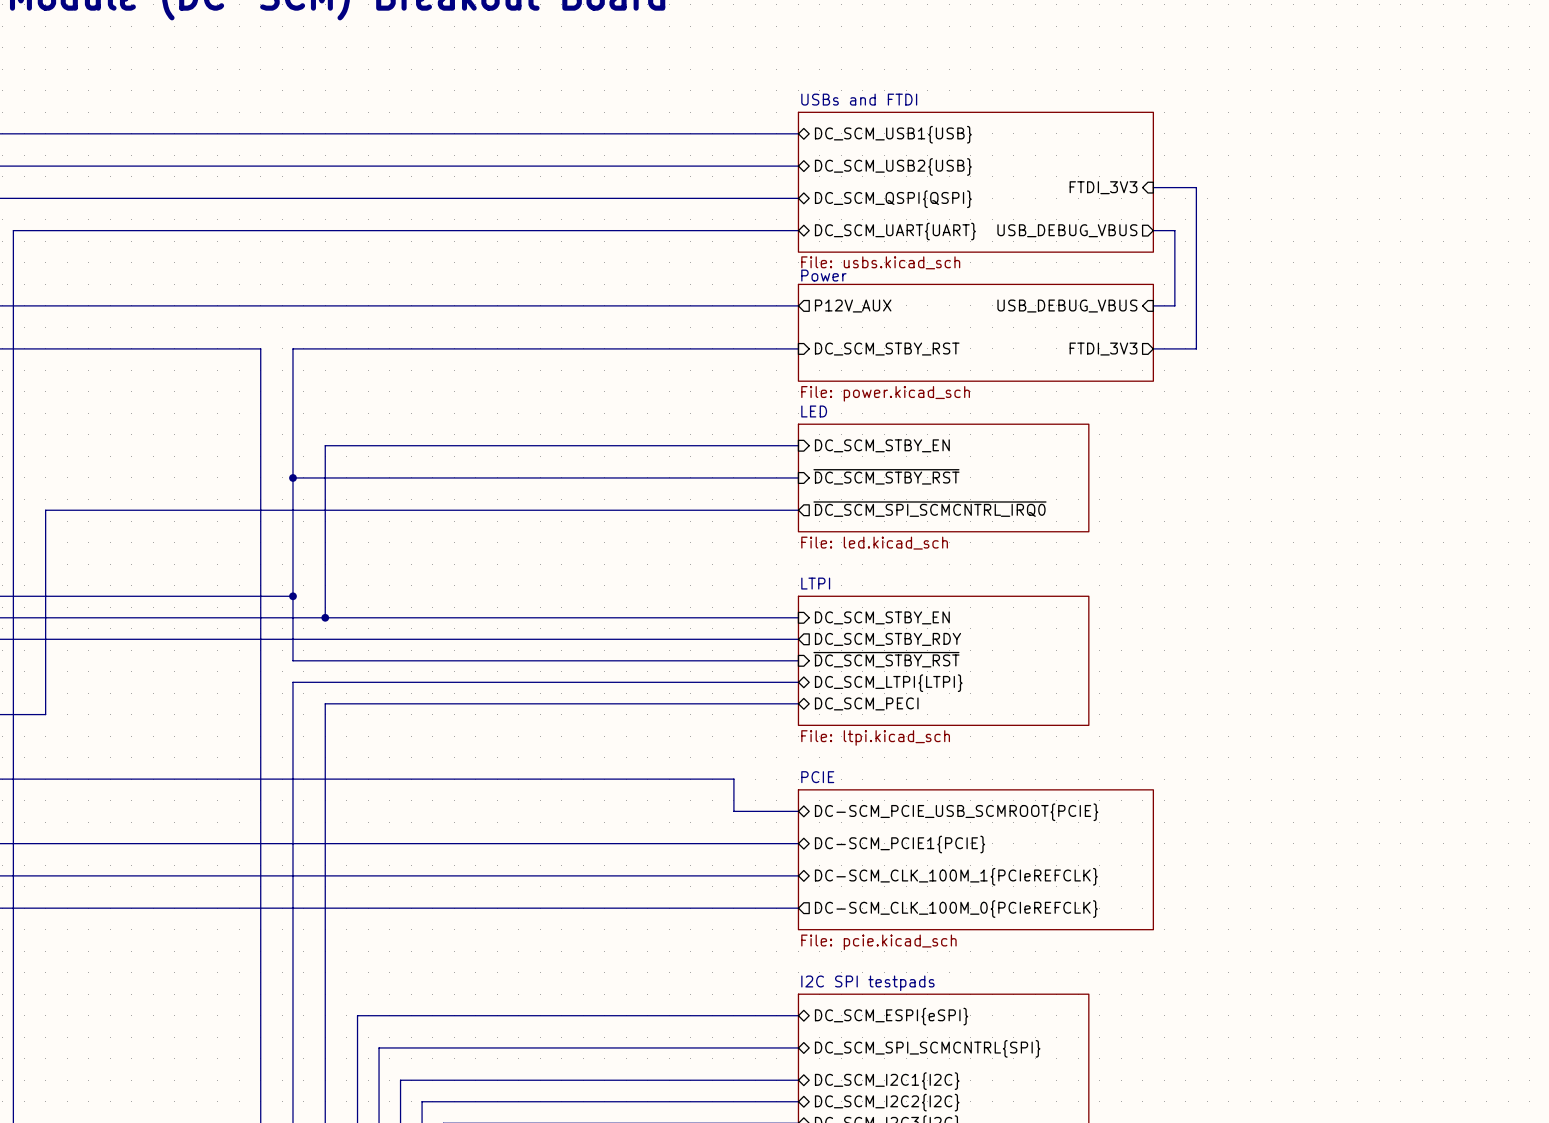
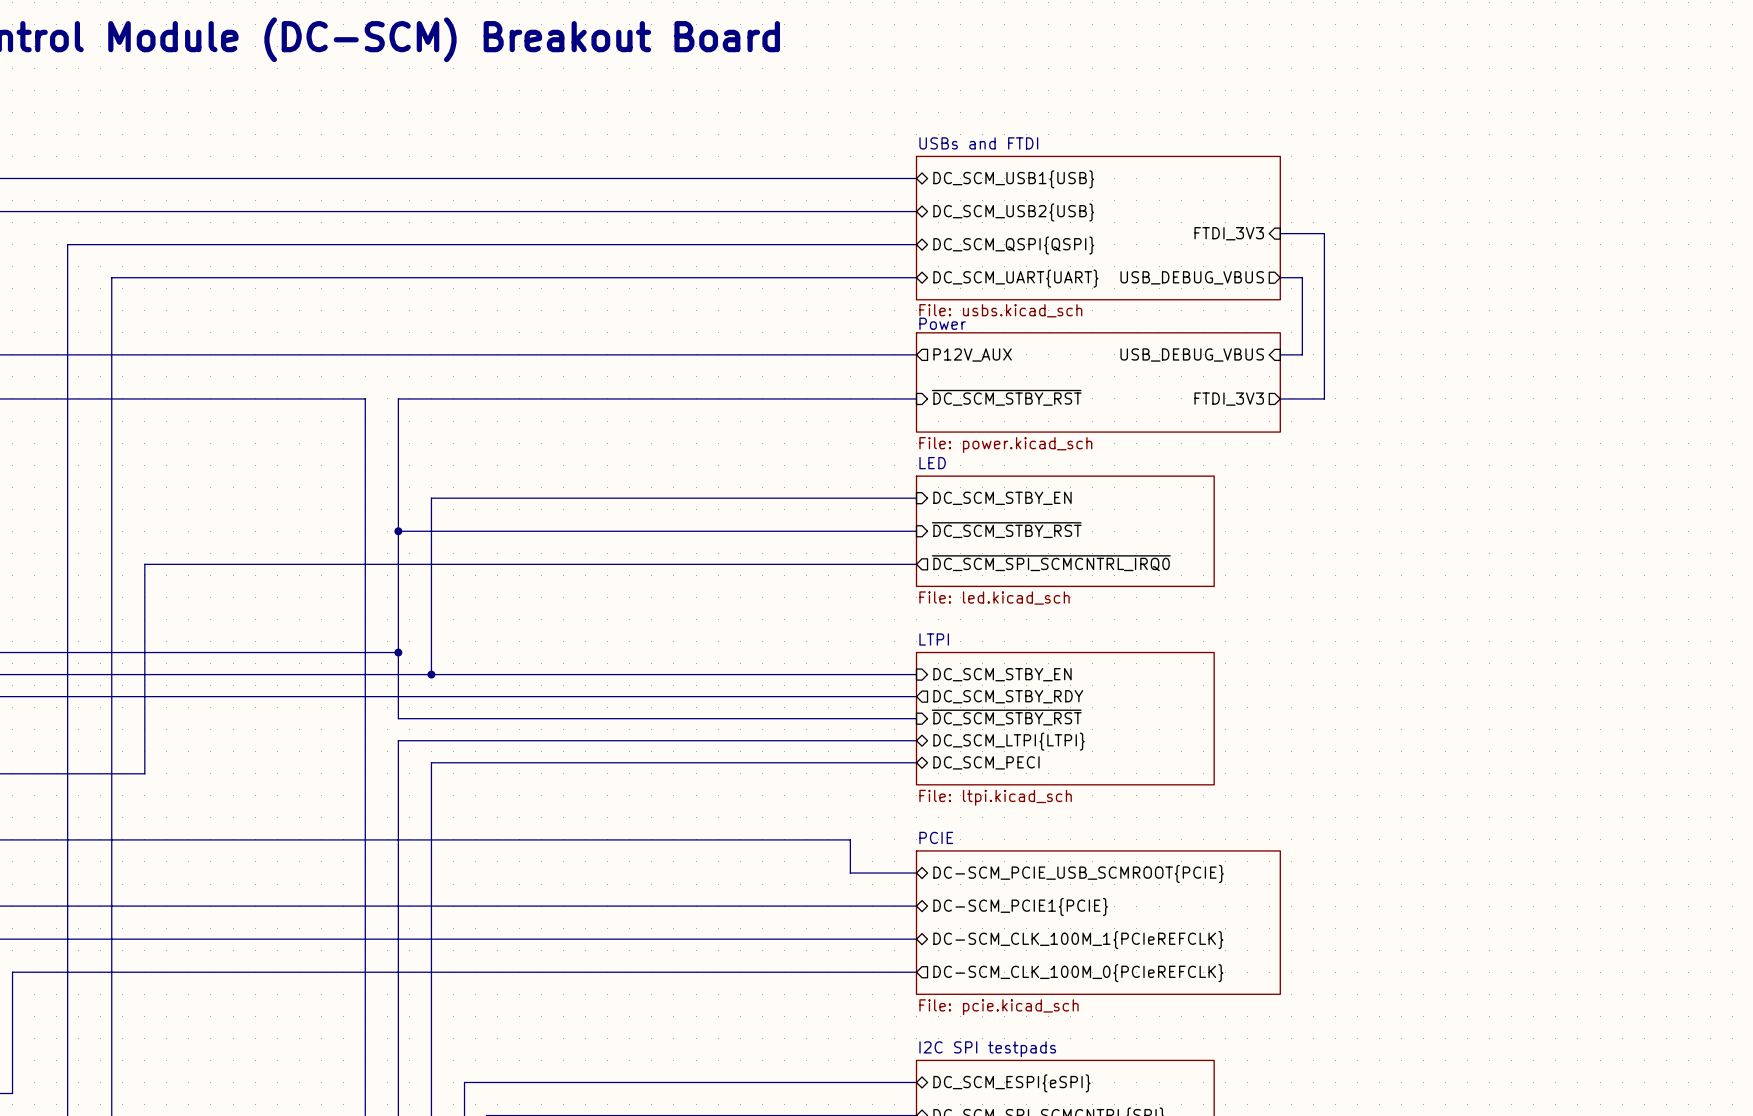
sheet pin: DC_SCM_STBY_RST (887, 349) -> ~{DC_SCM_STBY_RST} (1006, 397)

